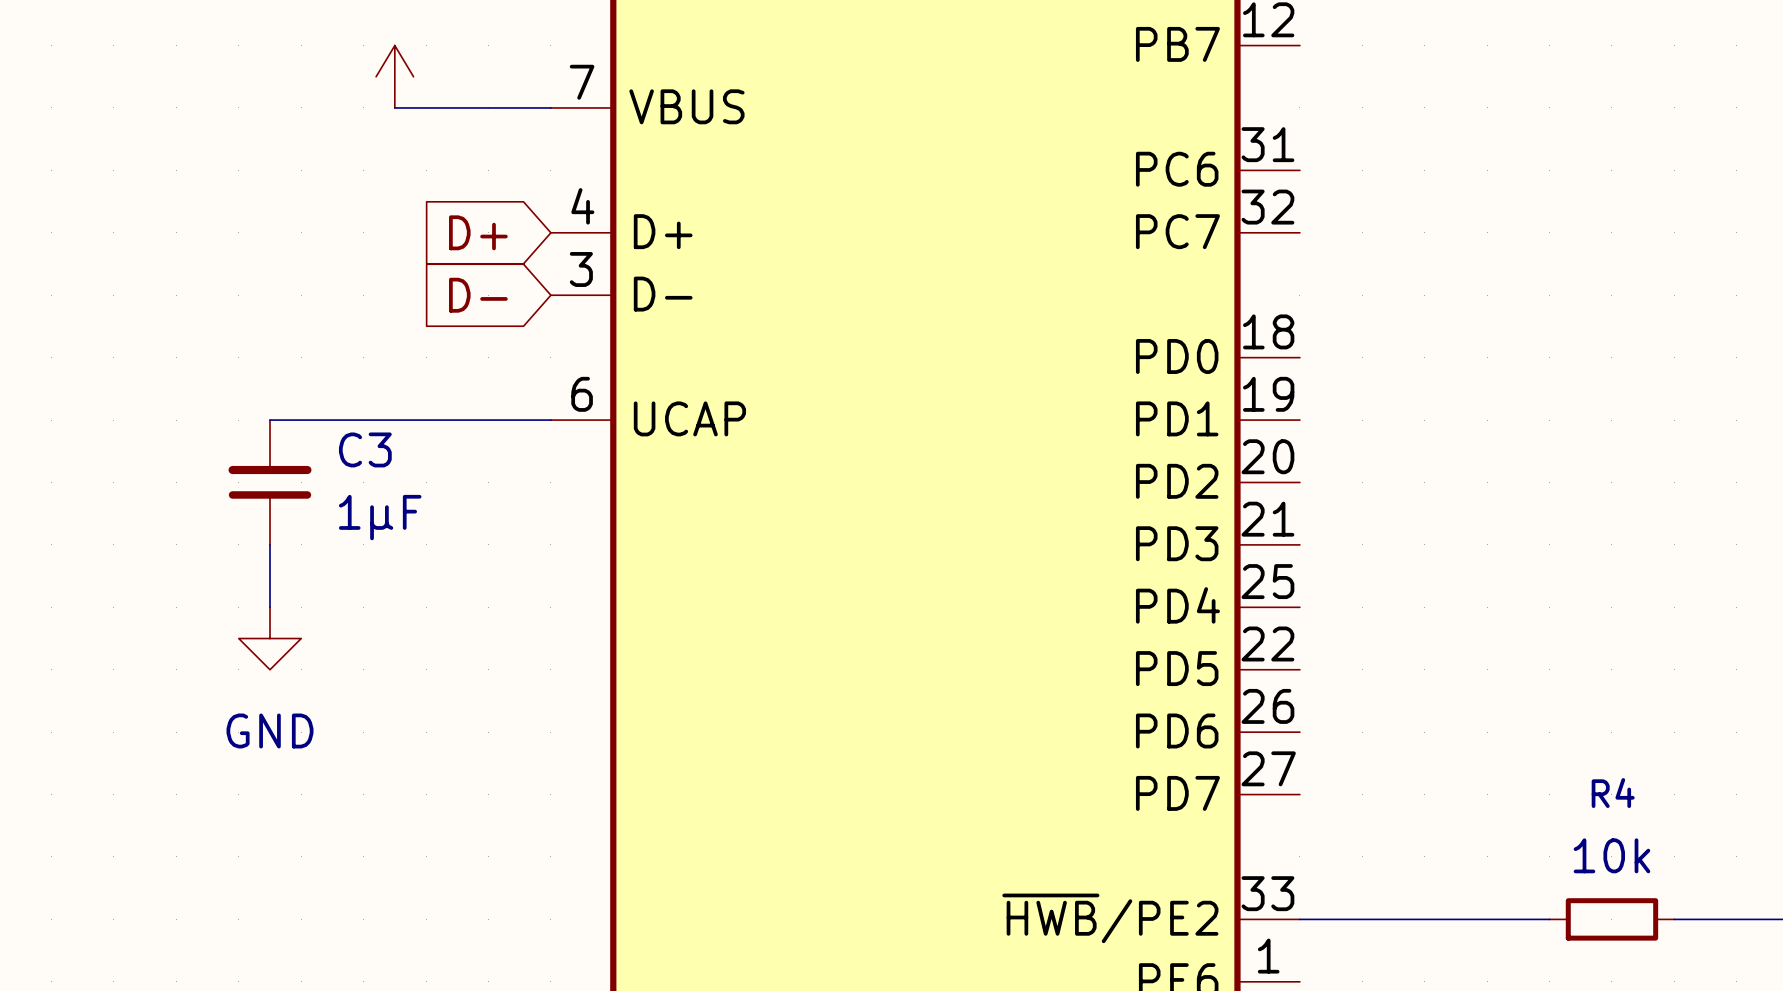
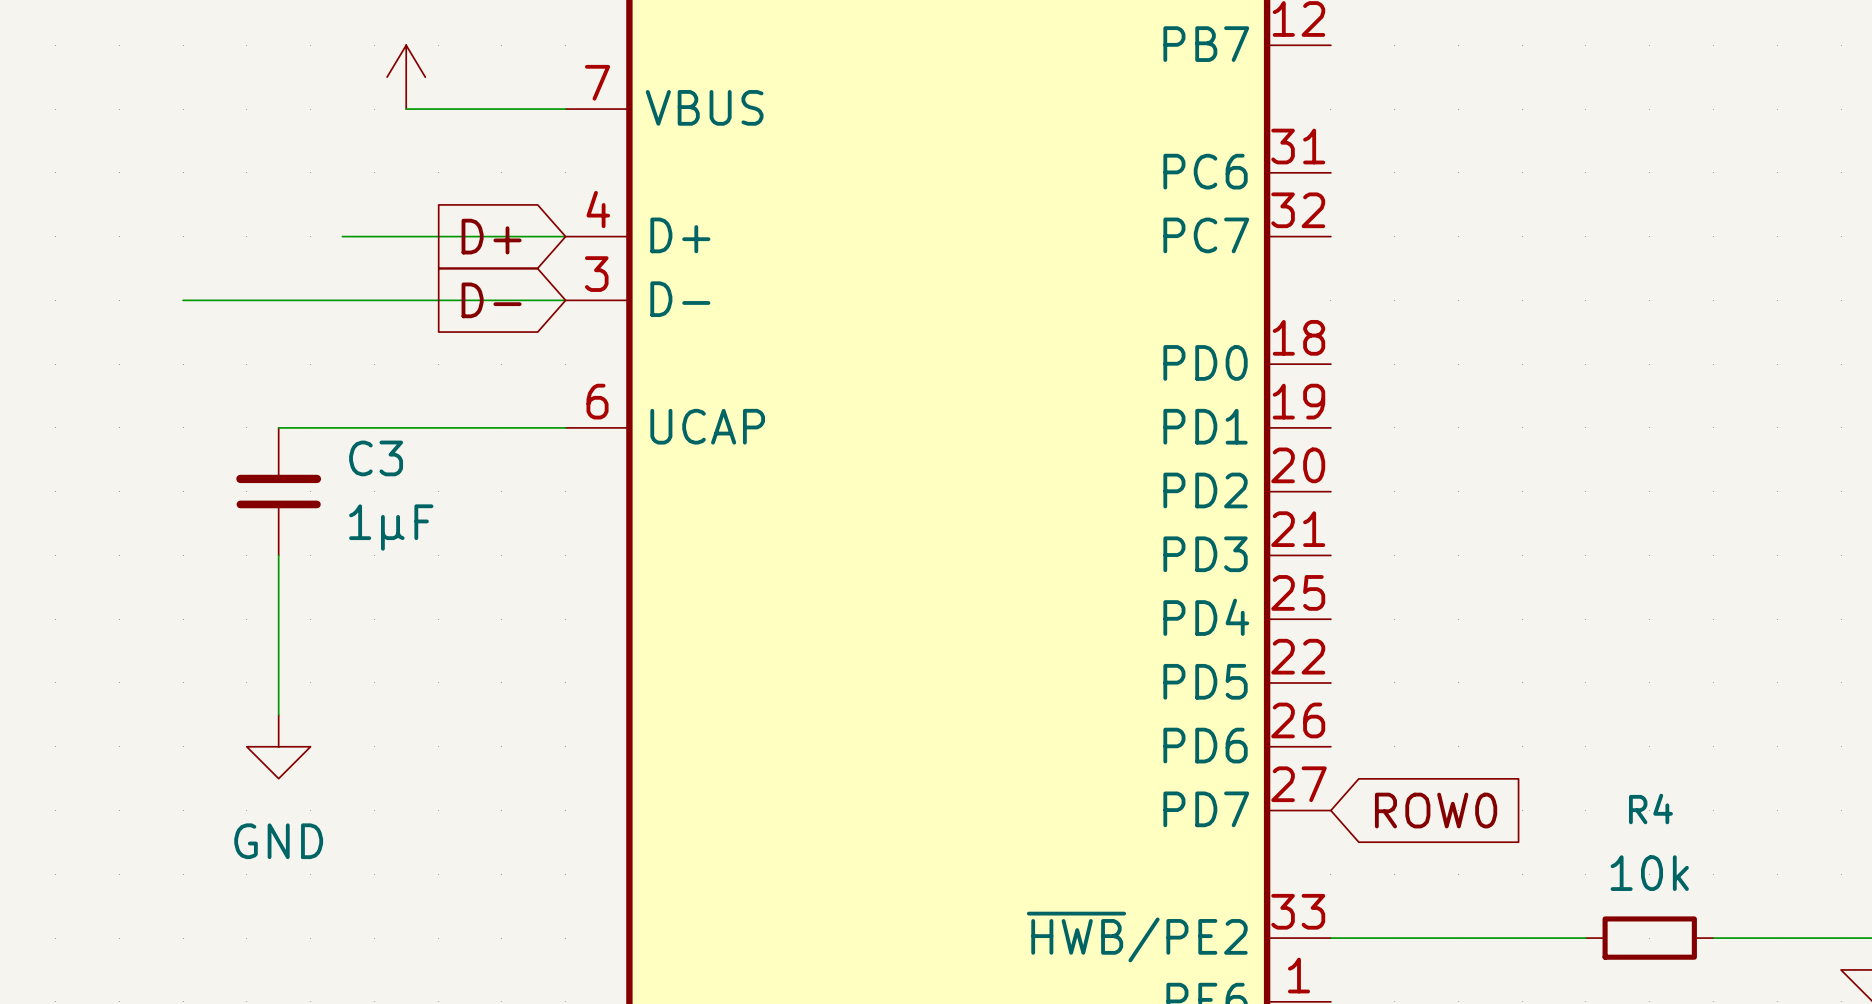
wire: none -> (342, 236) (565, 236)
wire: none -> (183, 300) (565, 300)
wire: none -> (278, 619) (278, 714)
power symbol position: GND (270, 638) -> GND (278, 746)
global label: none -> ROW0 (1436, 810)

